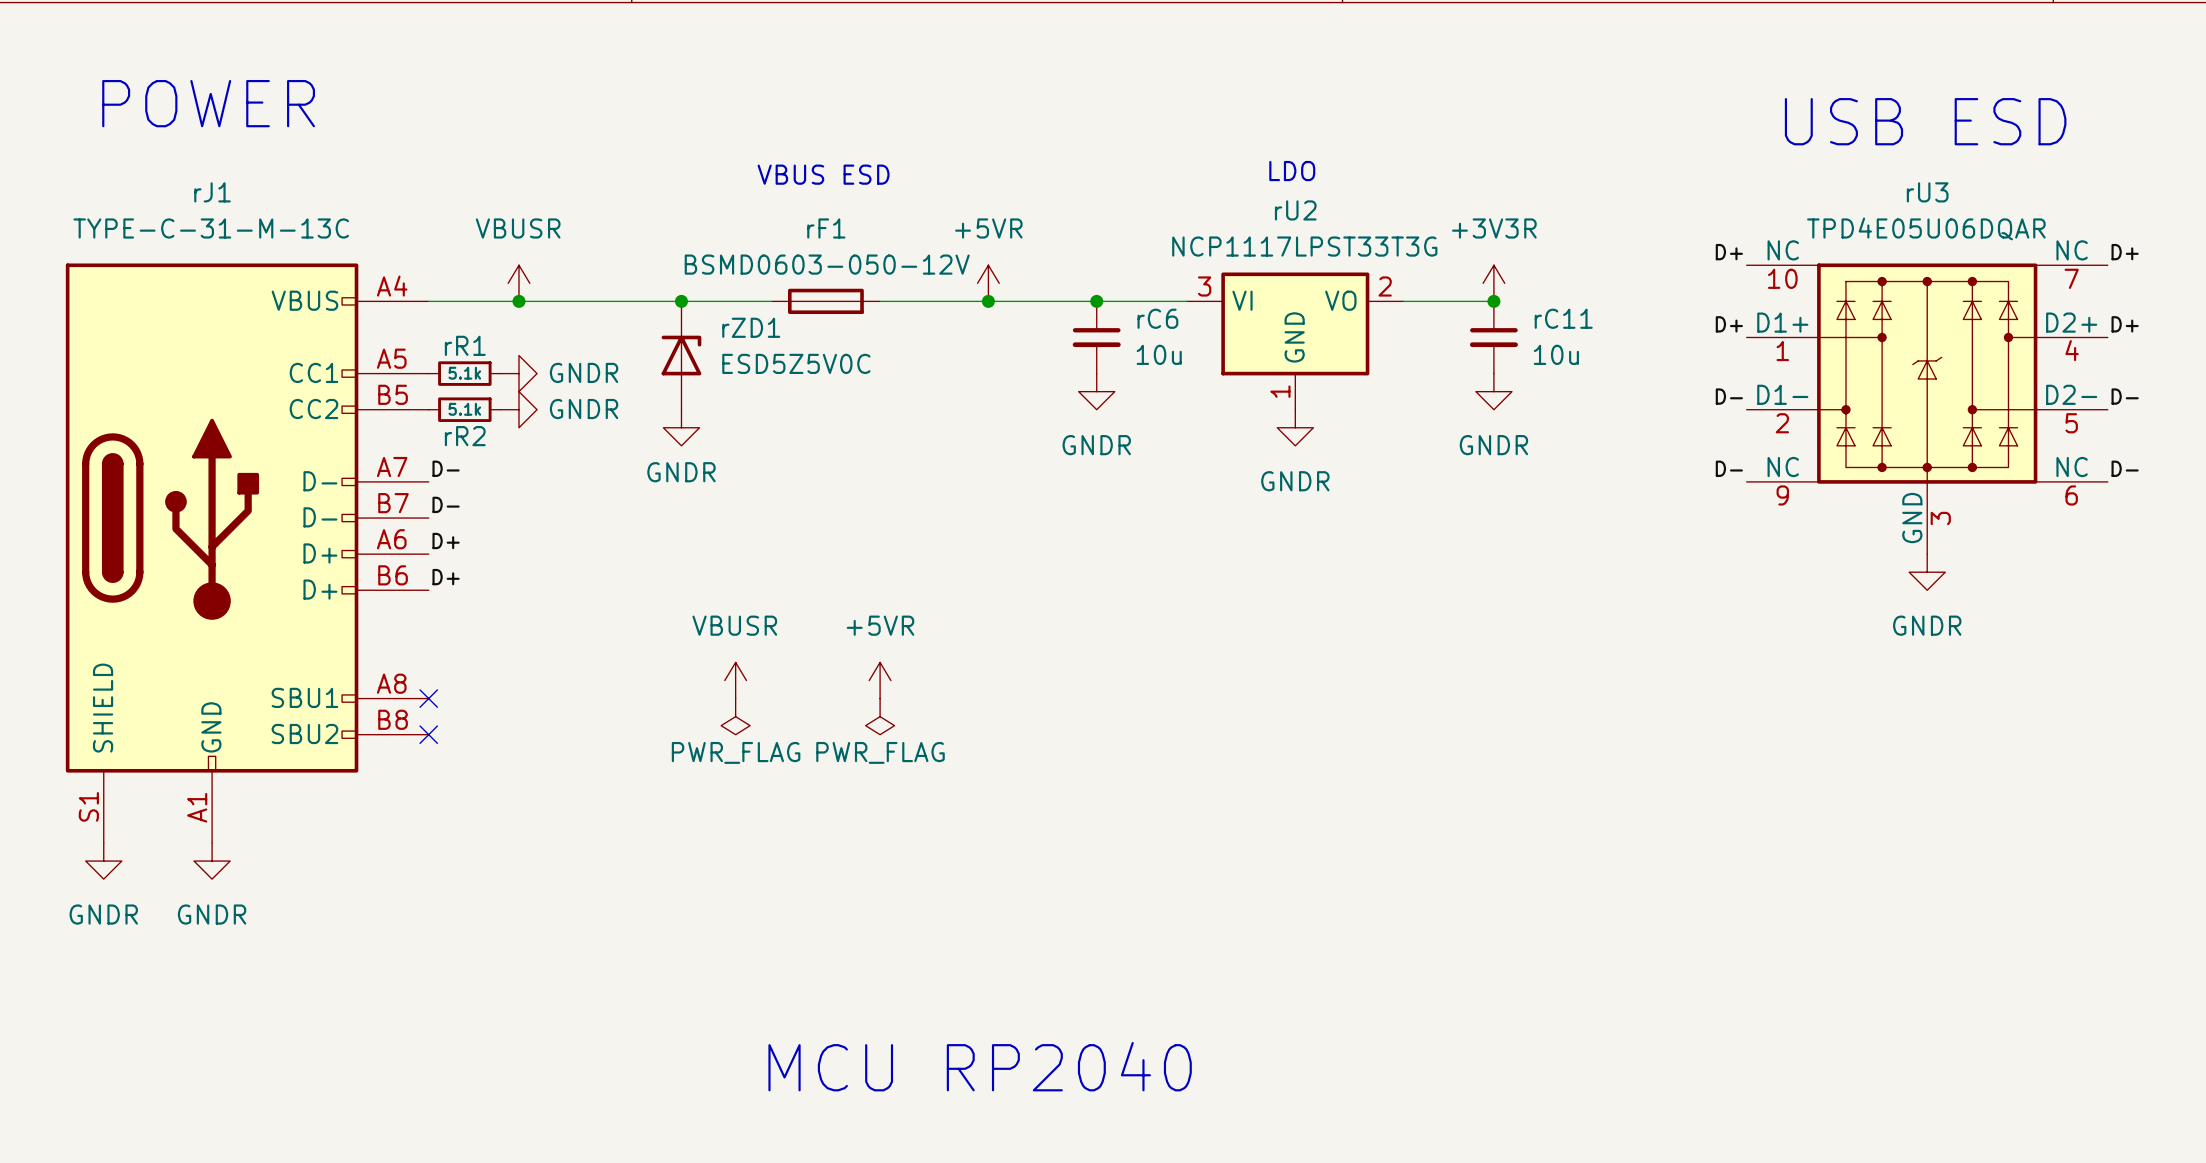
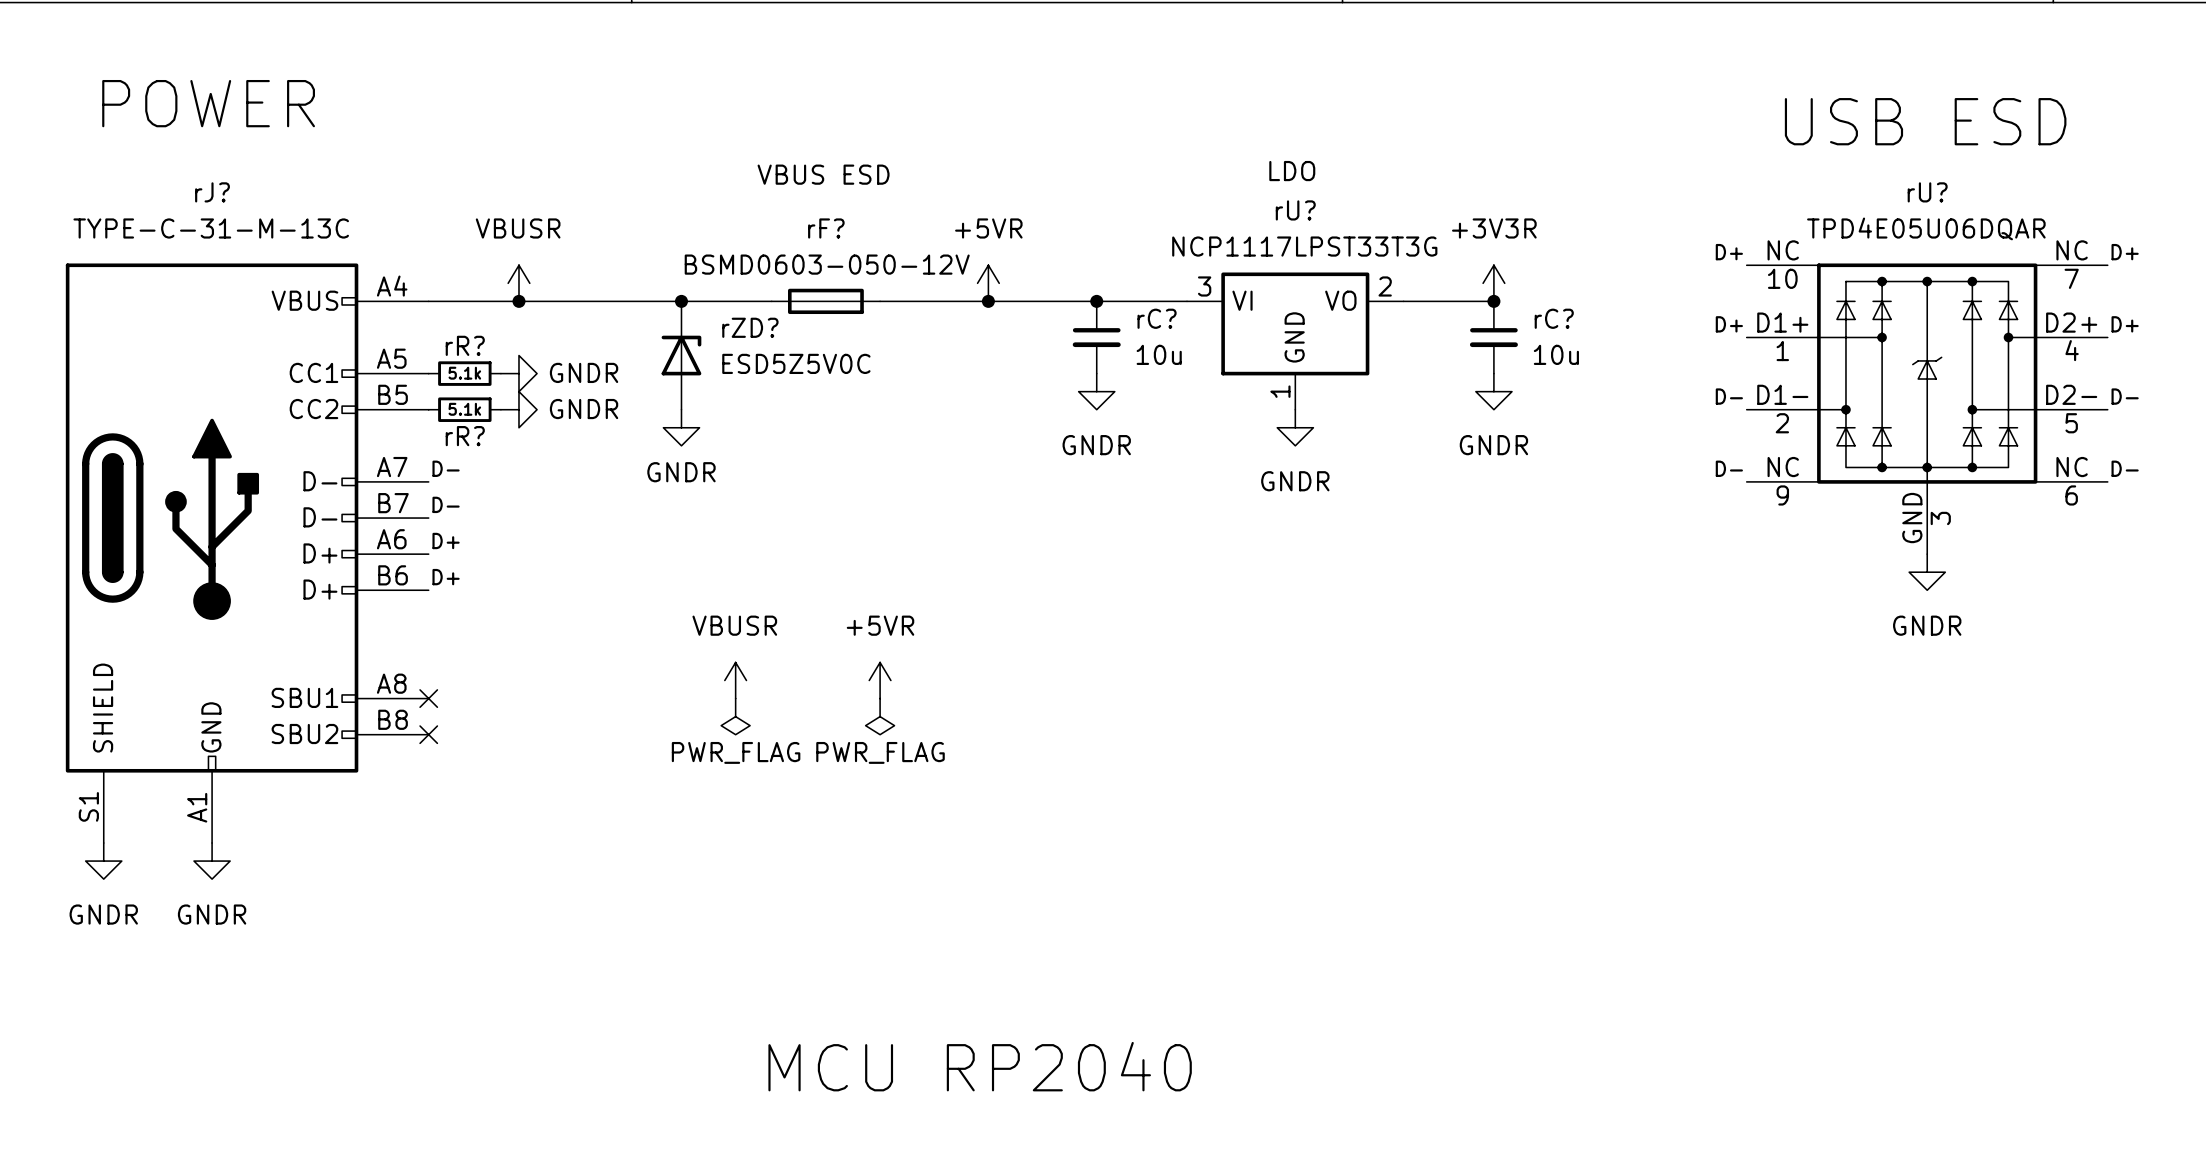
rJ1 name: rJ1 (212, 192) -> rJ? (212, 192)
rU3 name: rU3 (1927, 192) -> rU? (1927, 192)
rU2 name: rU2 (1295, 210) -> rU? (1295, 210)
rF1 name: rF1 (826, 228) -> rF? (826, 228)
rC6 name: rC6 (1157, 318) -> rC? (1157, 318)
rC11 name: rC11 (1563, 318) -> rC? (1554, 318)
rZD1 name: rZD1 (751, 327) -> rZD? (750, 327)
rR1 name: rR1 (465, 345) -> rR? (465, 345)
rR2 name: rR2 (465, 436) -> rR? (465, 436)

